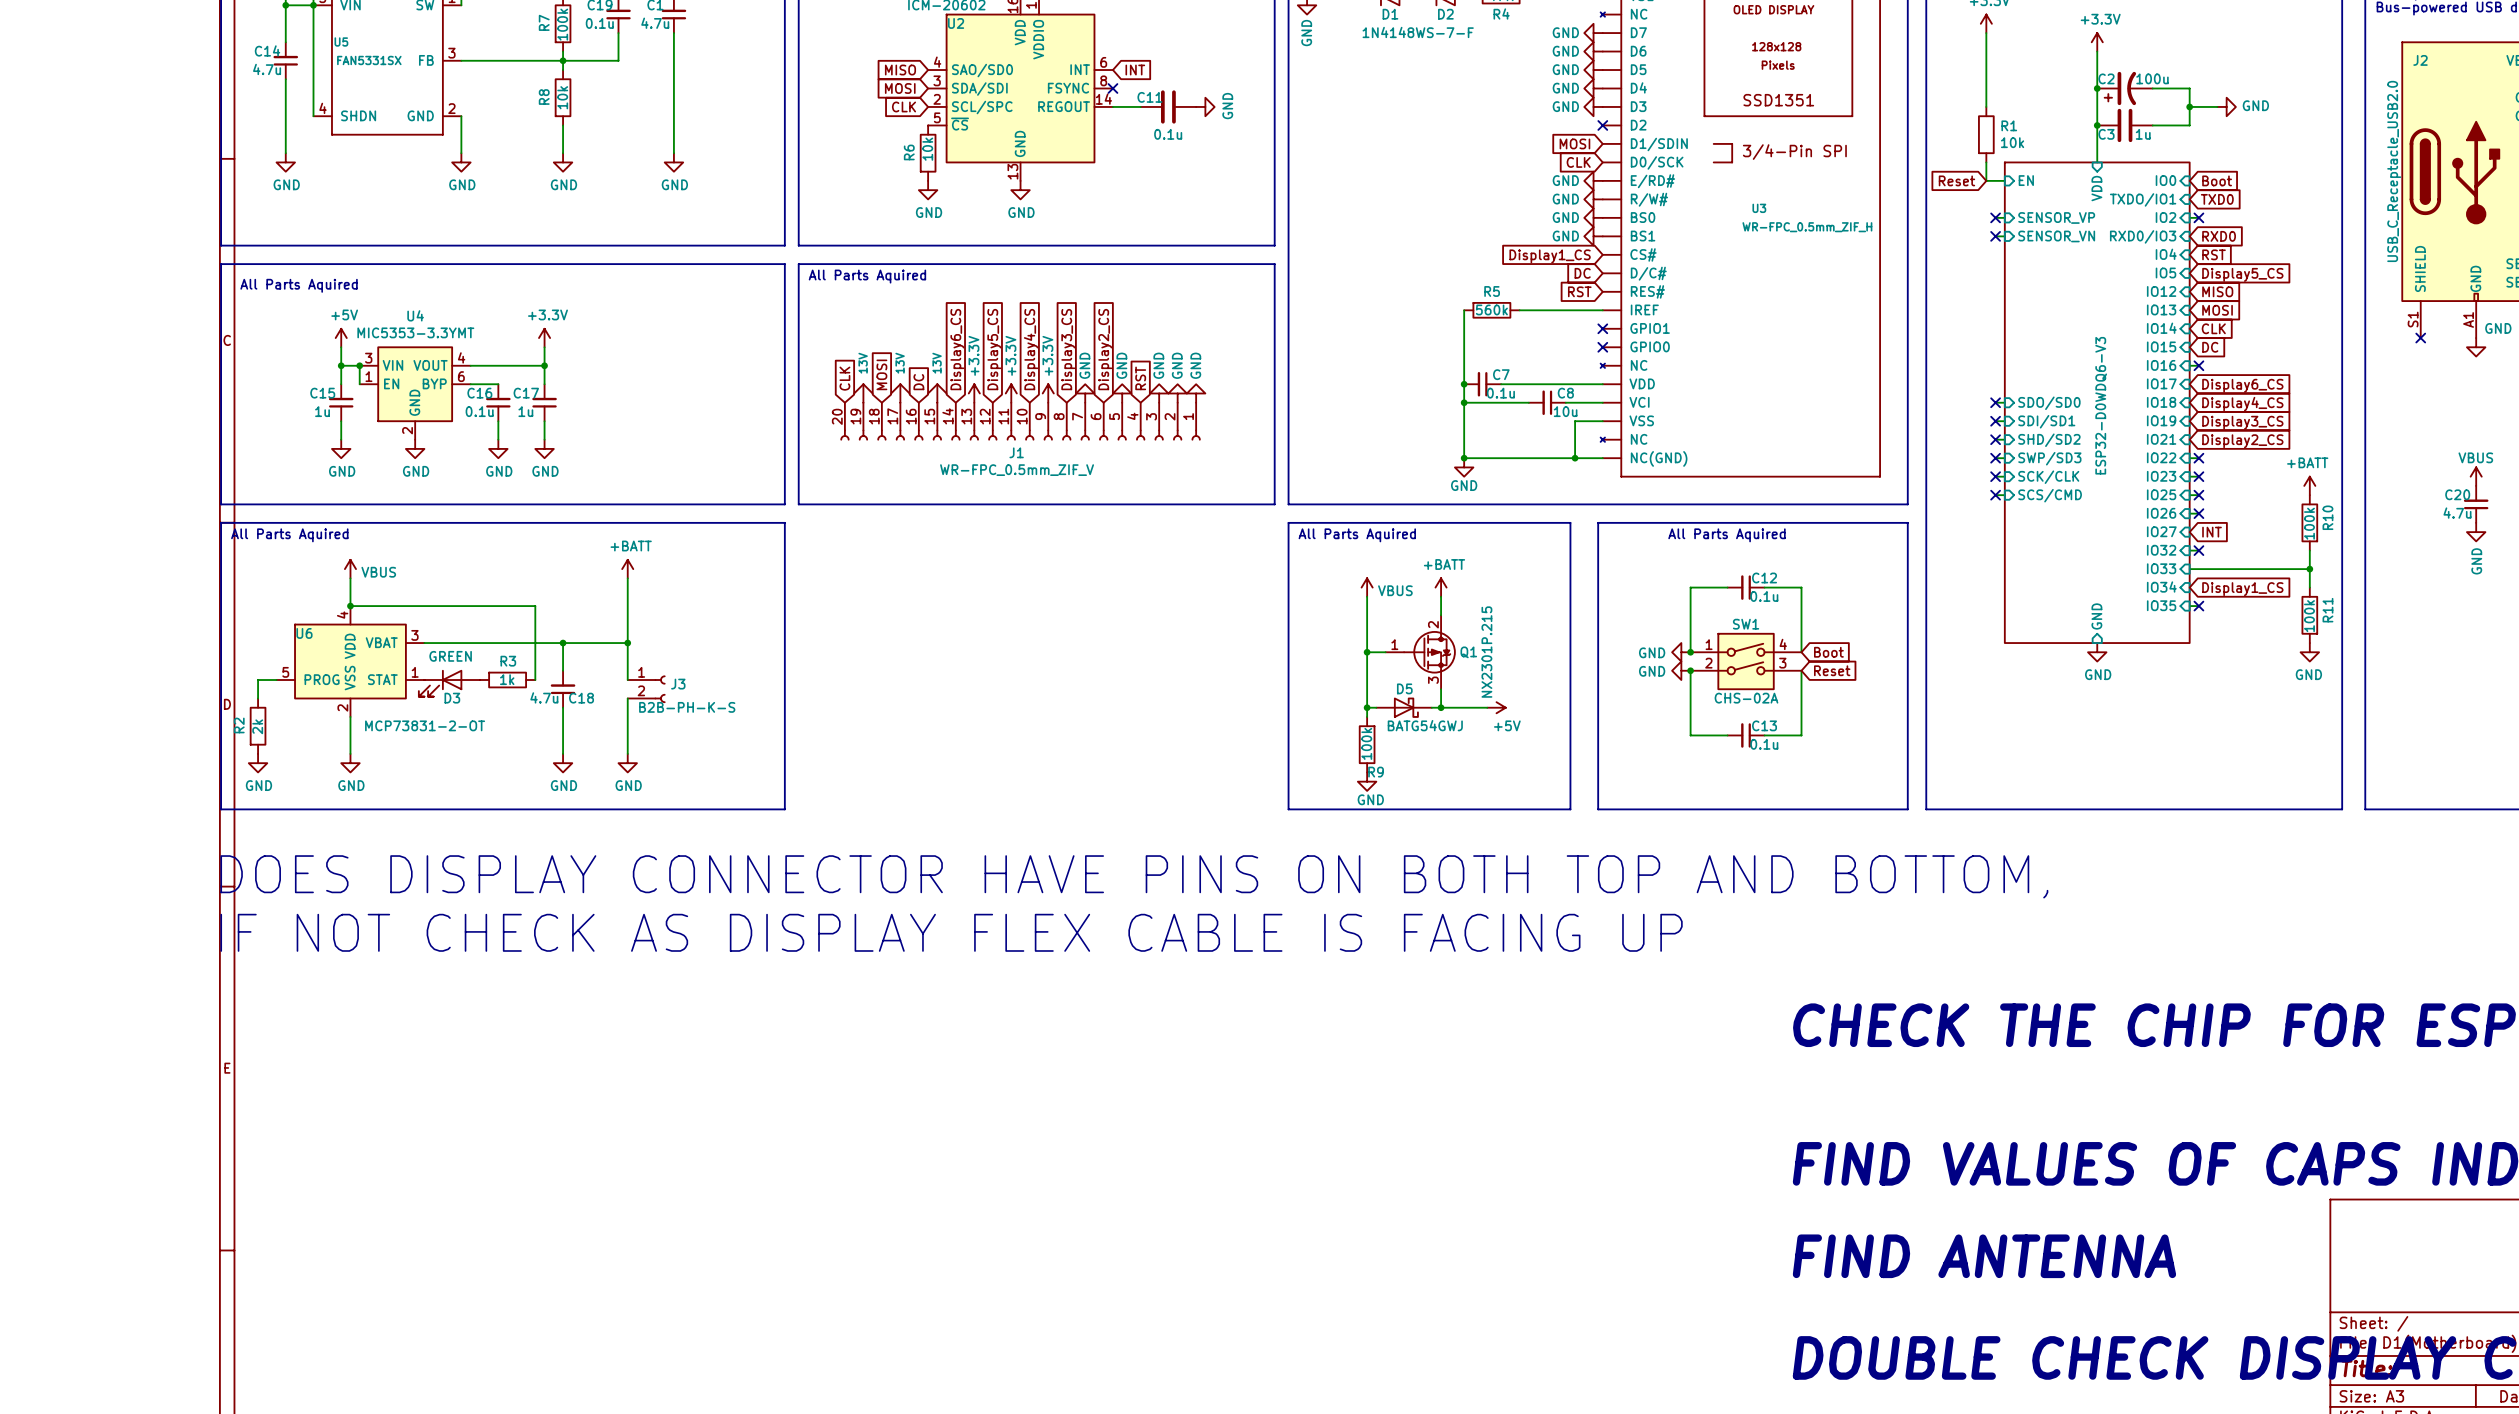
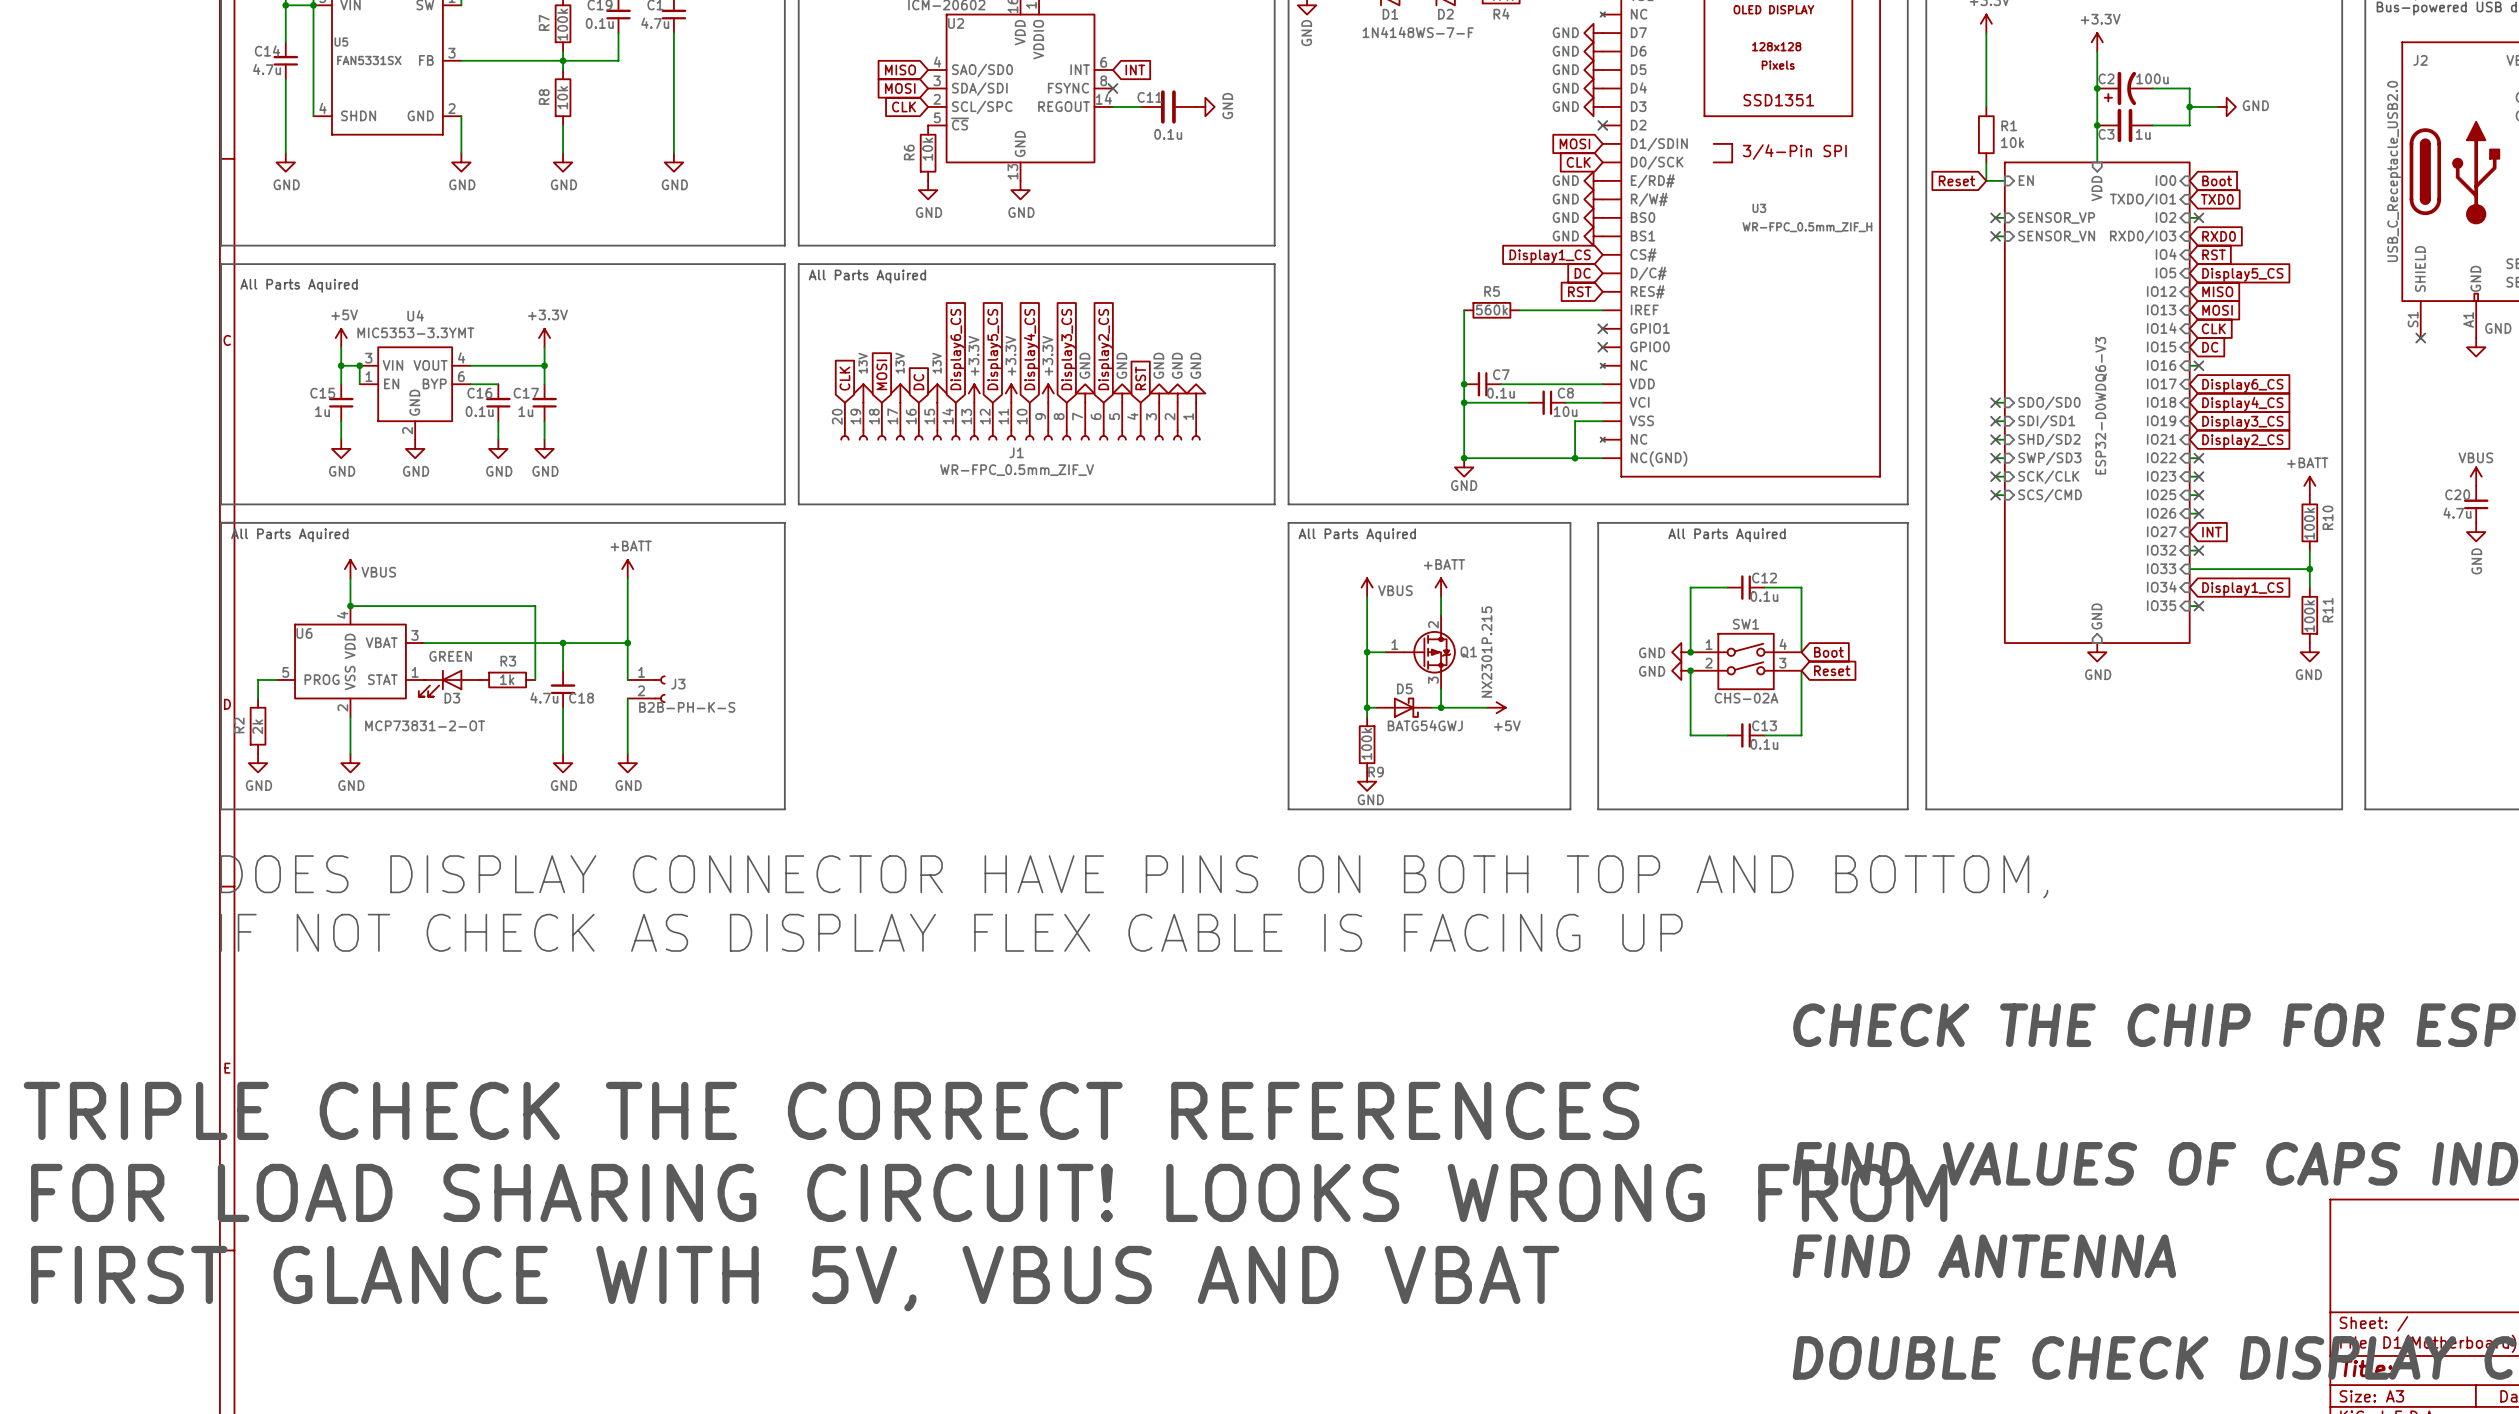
text: none -> TRIPLE CHECK THE CORRECT REFERENCES (831, 1110)
text: none -> FOR LOAD SHARING CIRCUIT! LOOKS WRONG FROM (989, 1192)
text: none -> FIRST GLANCE WITH 5V, VBUS AND VBAT (795, 1278)

